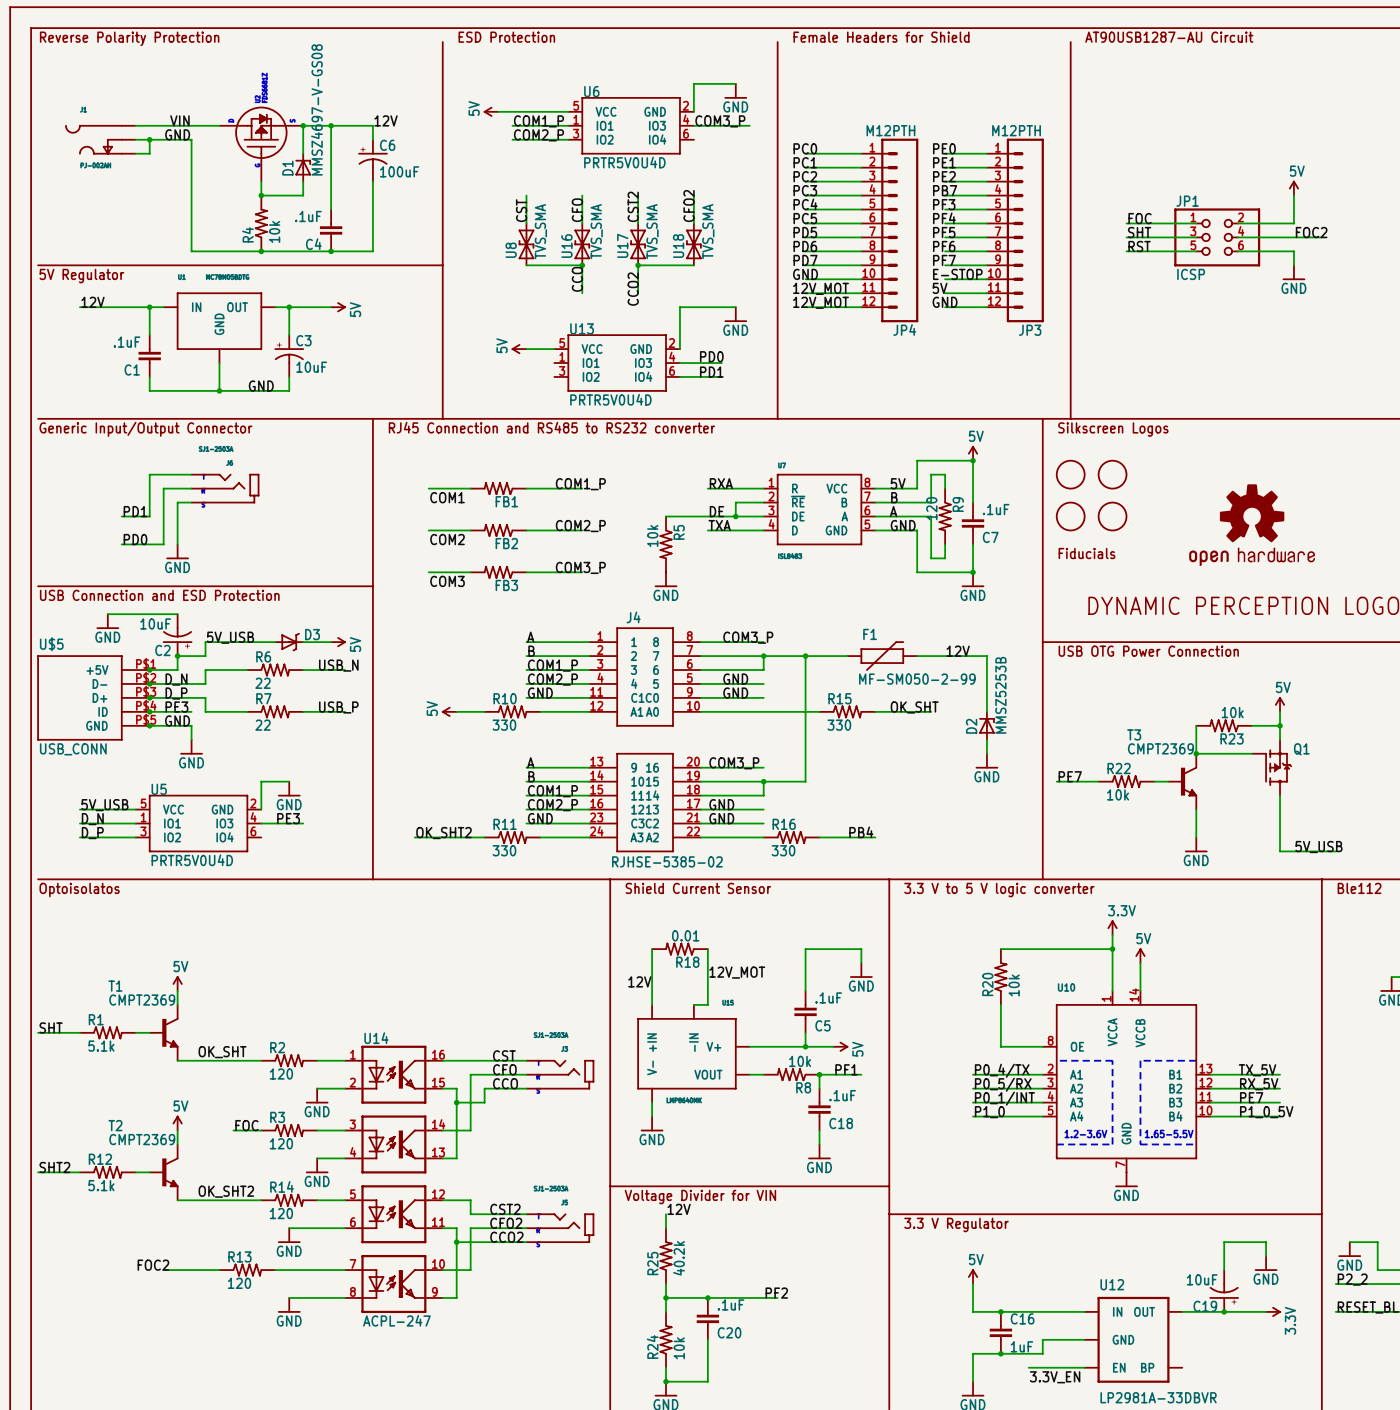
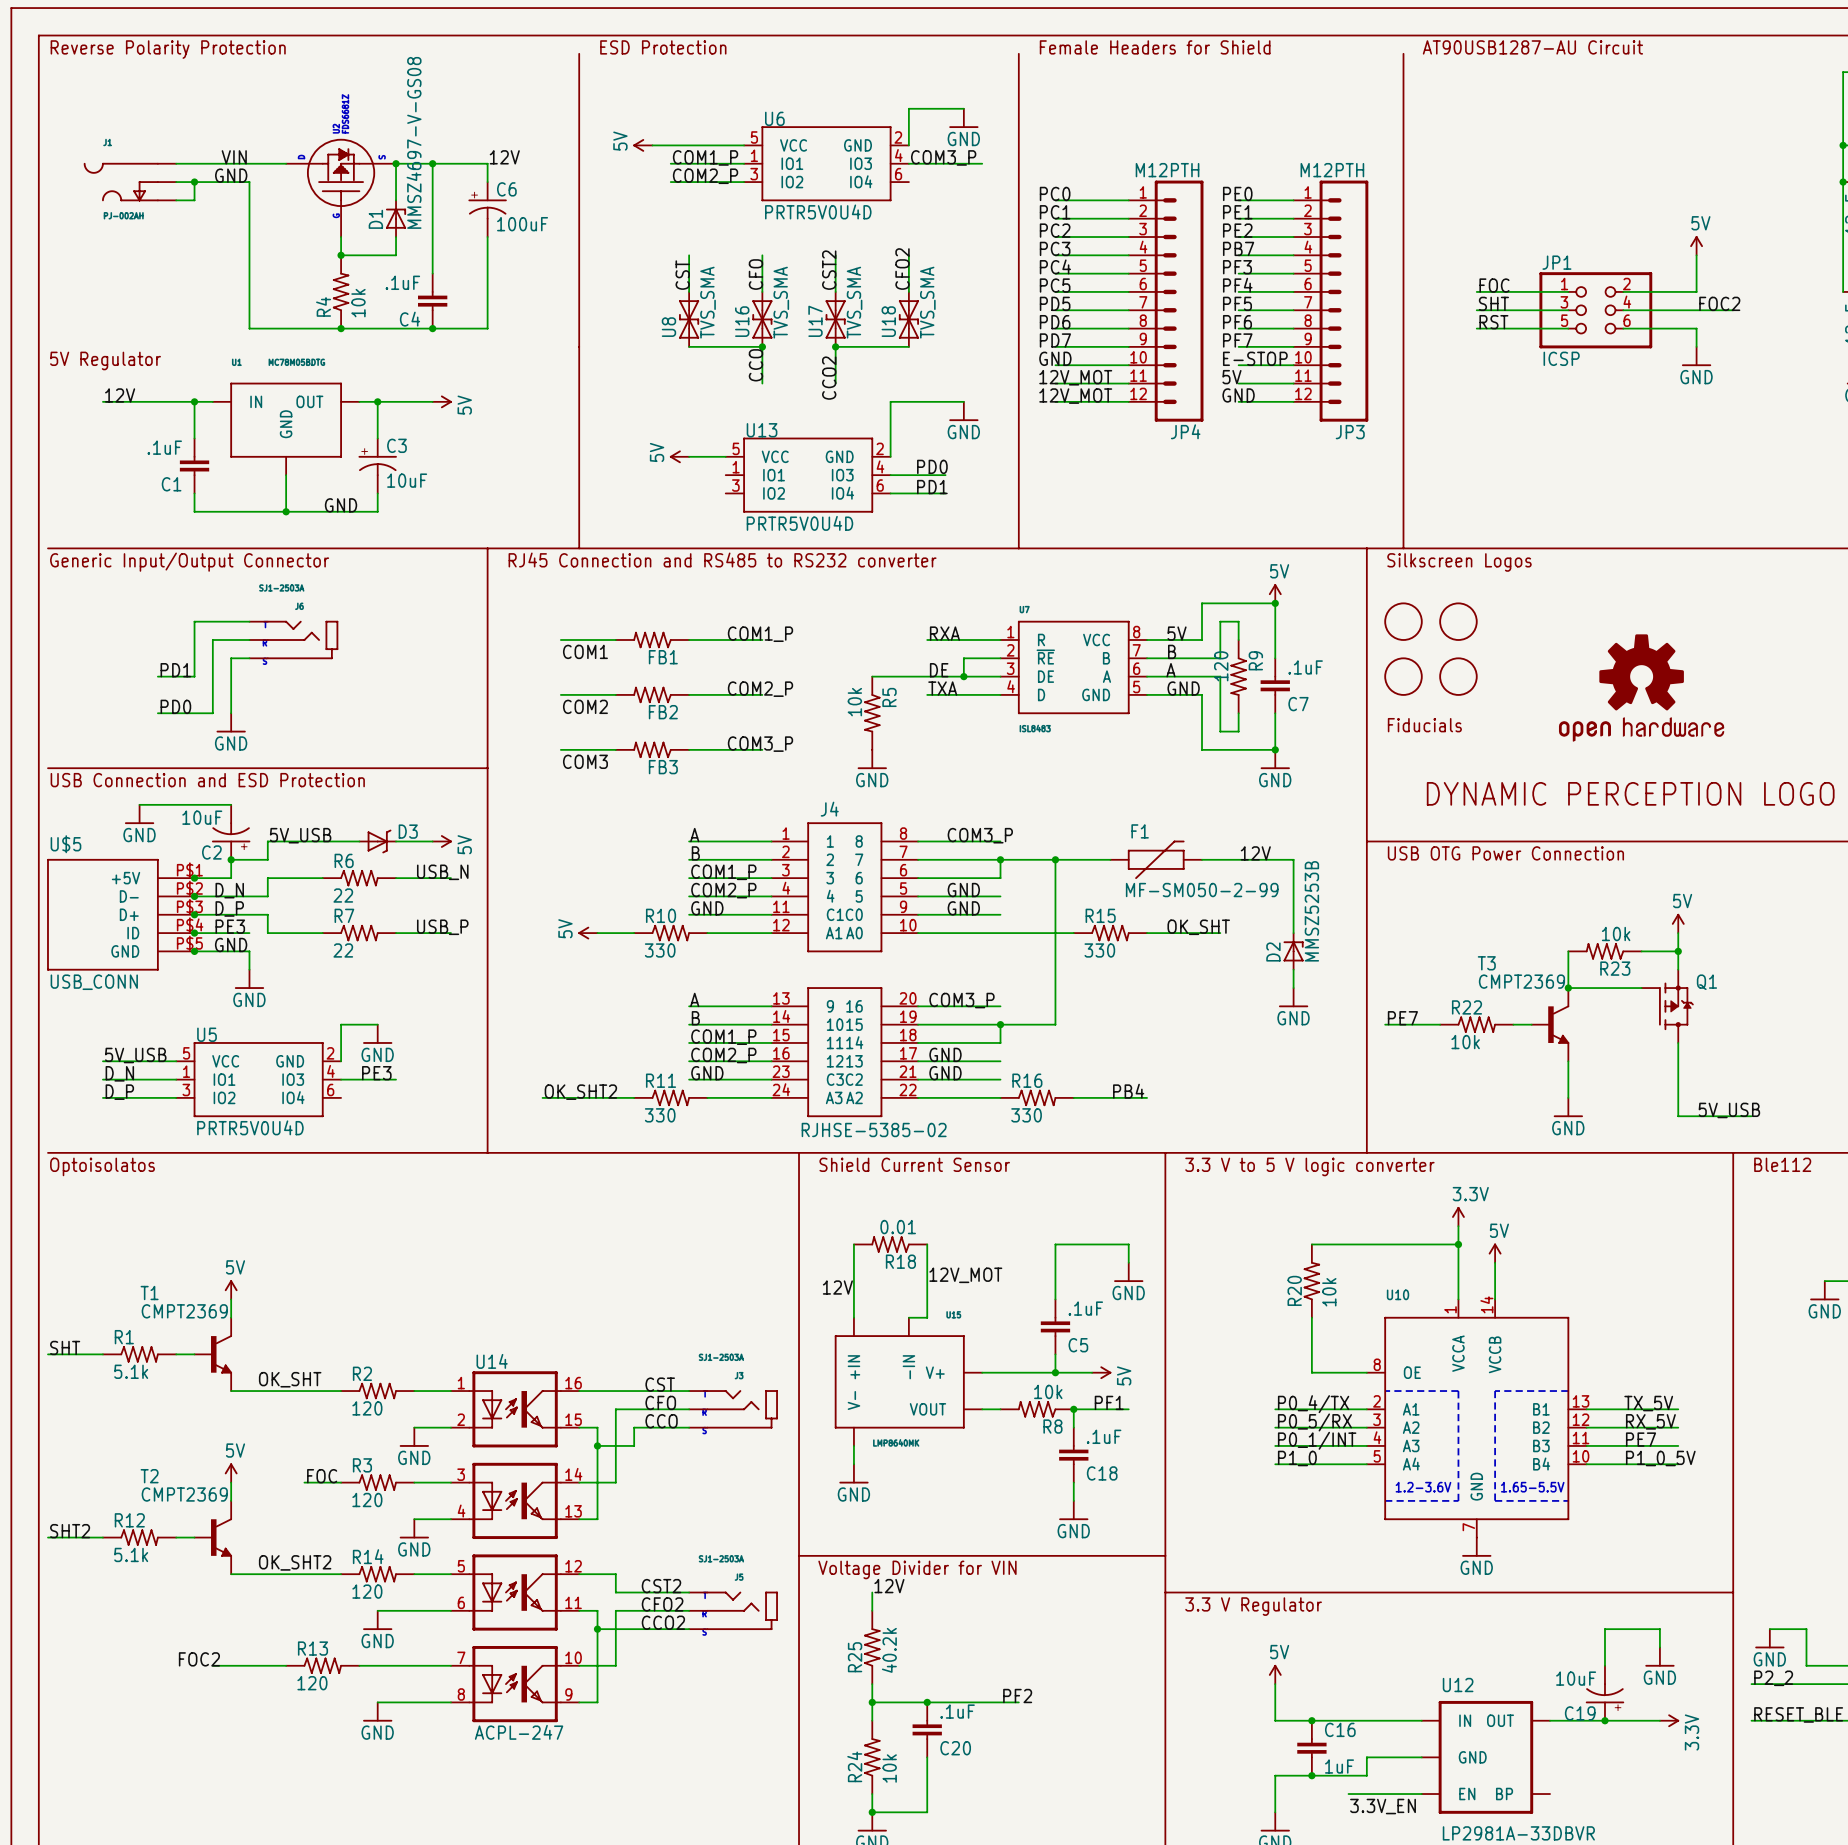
line: (38, 265) (442, 265) -> none

